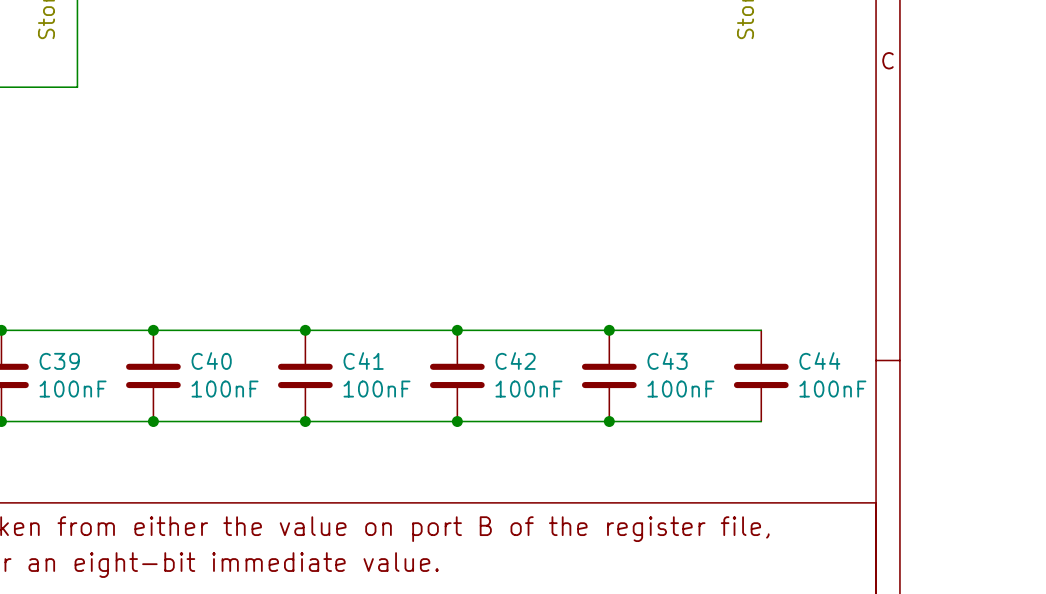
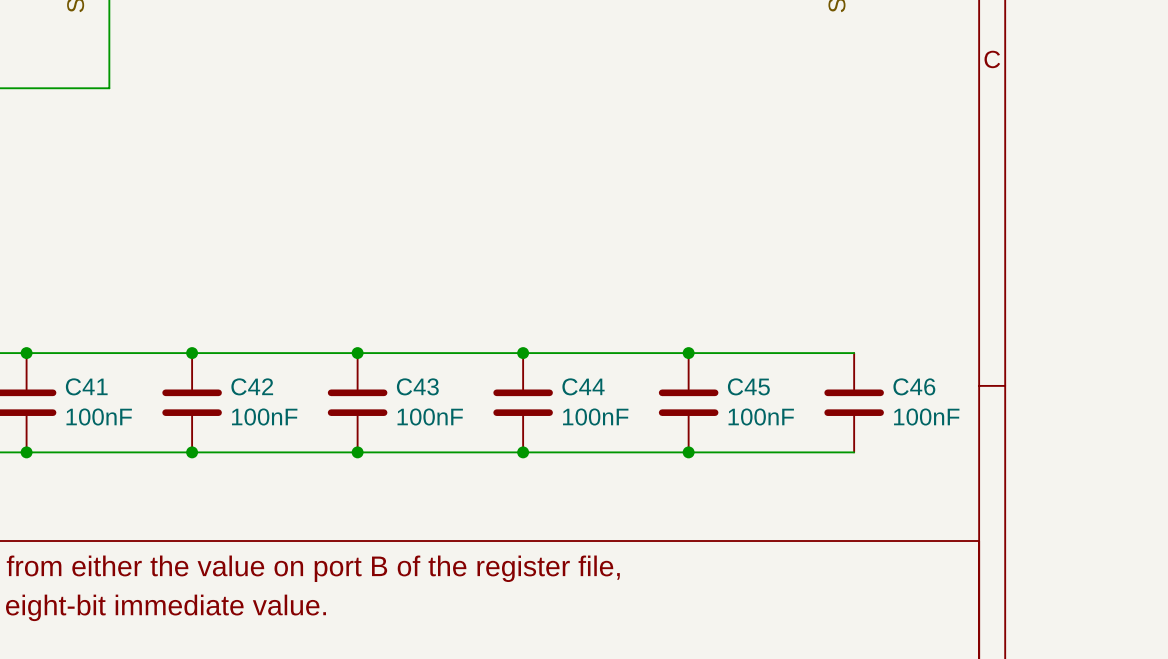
C39 name: C39 (59, 361) -> C41 (86, 386)
C40 name: C40 (211, 361) -> C42 (252, 386)
C41 name: C41 (363, 361) -> C43 (417, 386)
C42 name: C42 (515, 361) -> C44 (583, 386)
C43 name: C43 (667, 361) -> C45 (748, 386)
C44 name: C44 (819, 361) -> C46 (914, 386)

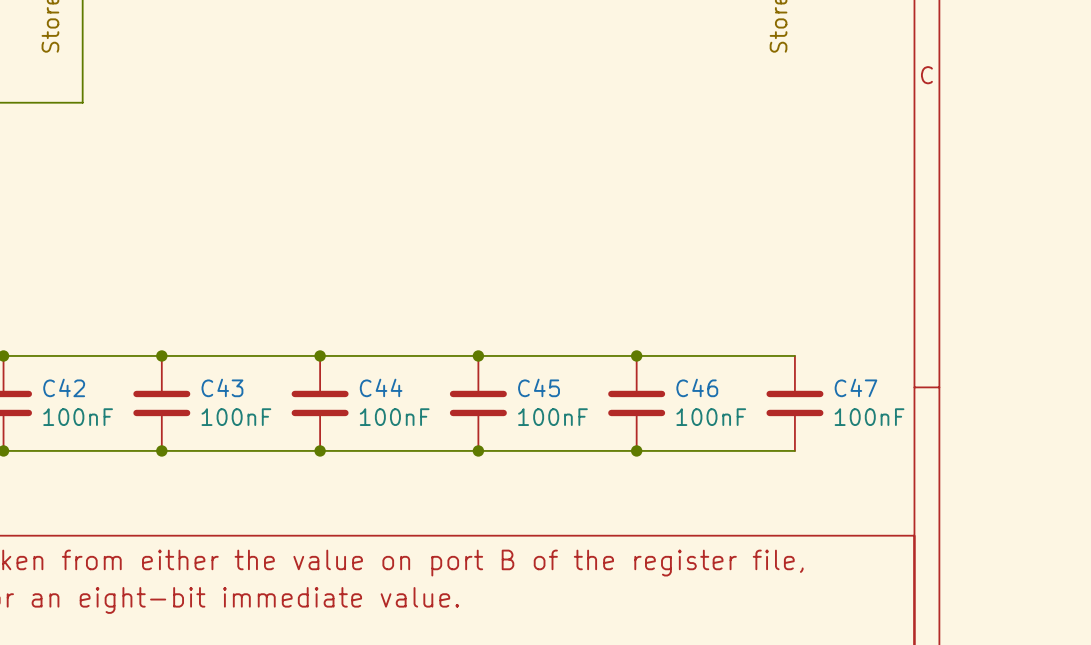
C41 name: C41 (86, 386) -> C42 (64, 387)
C42 name: C42 (252, 386) -> C43 (222, 387)
C43 name: C43 (417, 386) -> C44 (381, 387)
C44 name: C44 (583, 386) -> C45 (539, 387)
C45 name: C45 (748, 386) -> C46 (697, 387)
C46 name: C46 (914, 386) -> C47 (855, 387)

